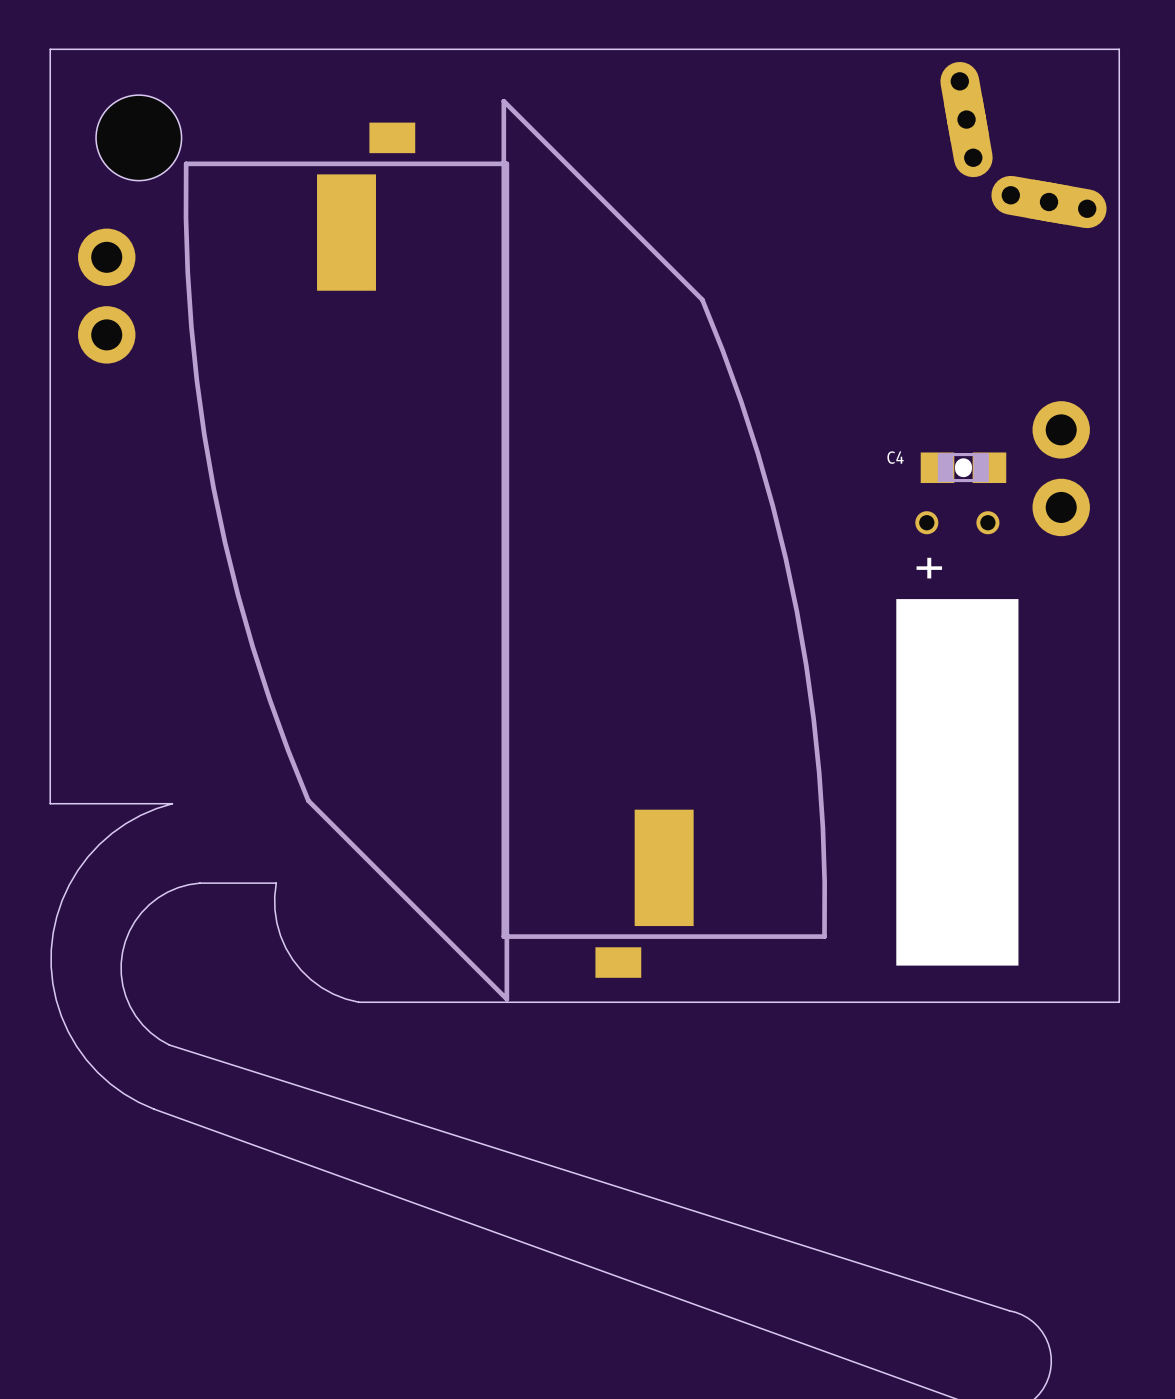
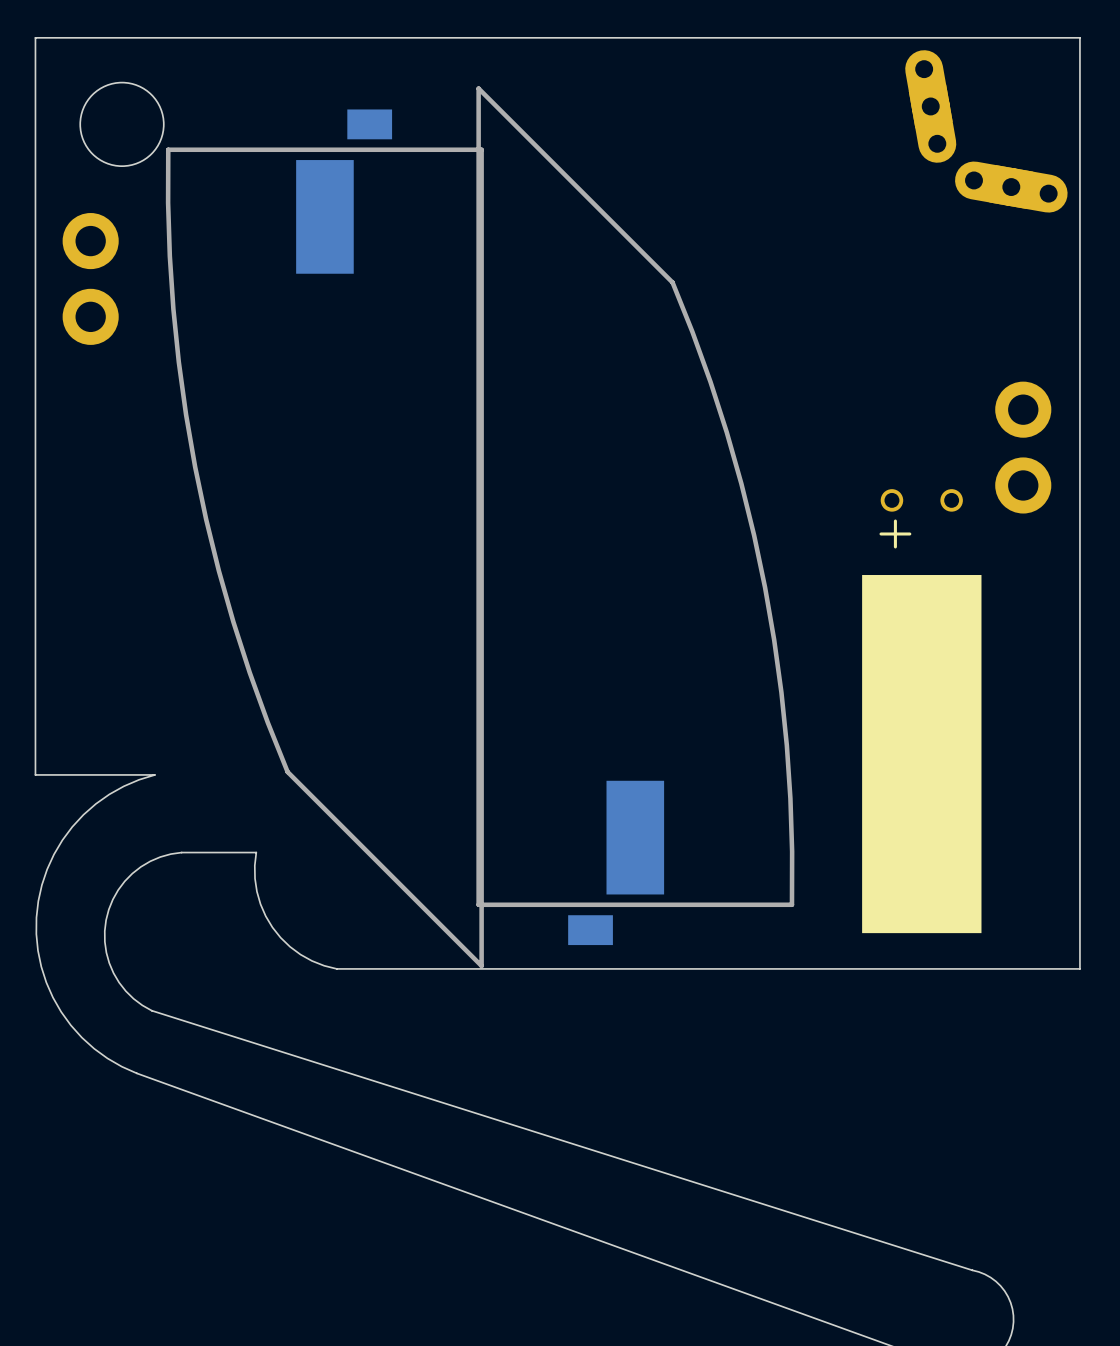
C4: (963, 467) -> none

